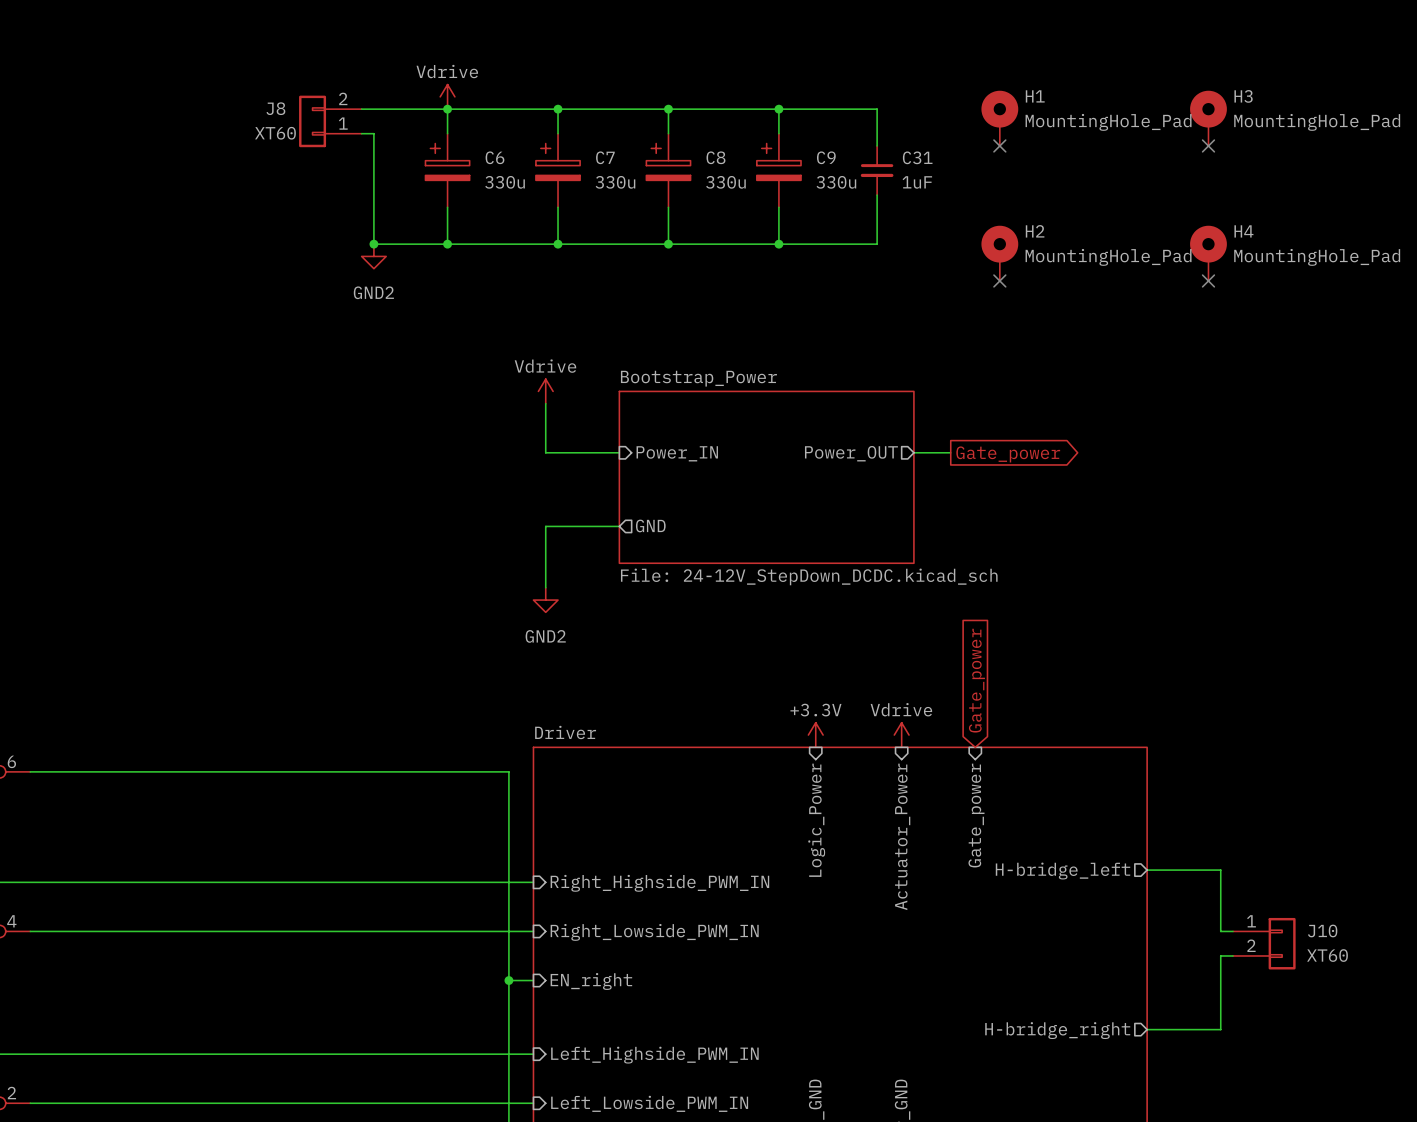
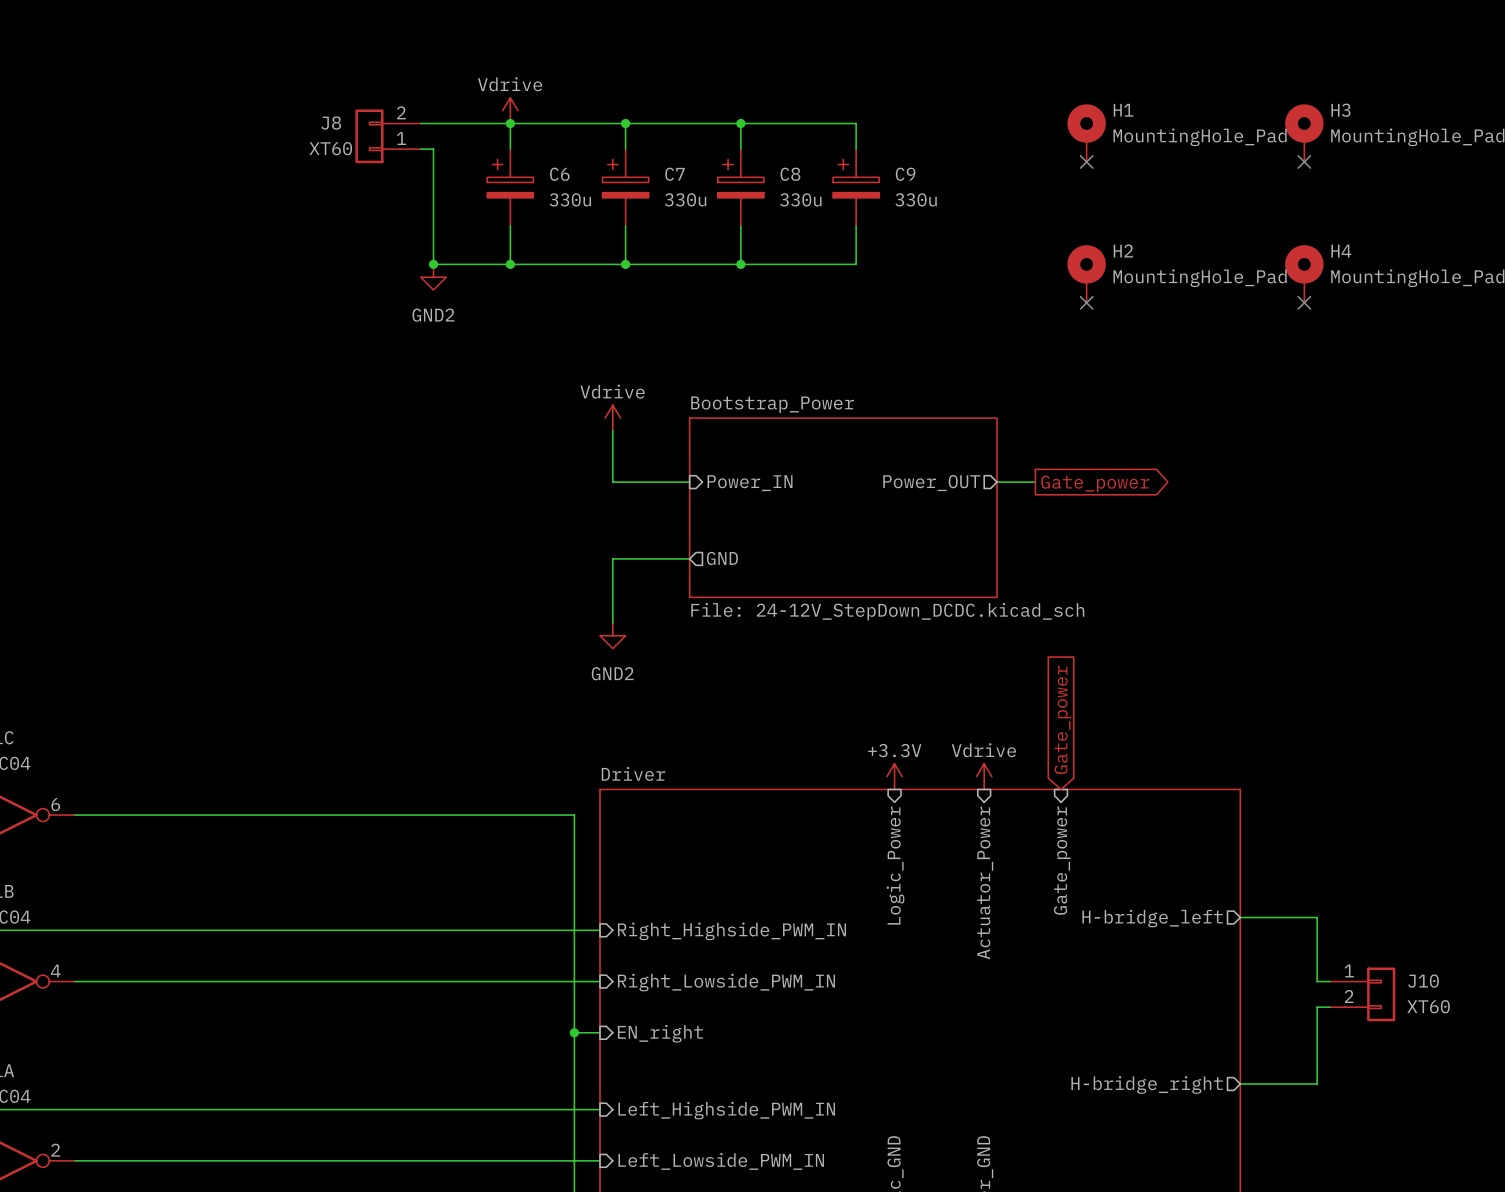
wire: (778, 109) (877, 109) (877, 145) -> none
junction: (778, 109) -> none
C31: 1uF (877, 170) -> none
wire: (877, 195) (877, 244) (778, 244) -> none
junction: (778, 244) -> none

